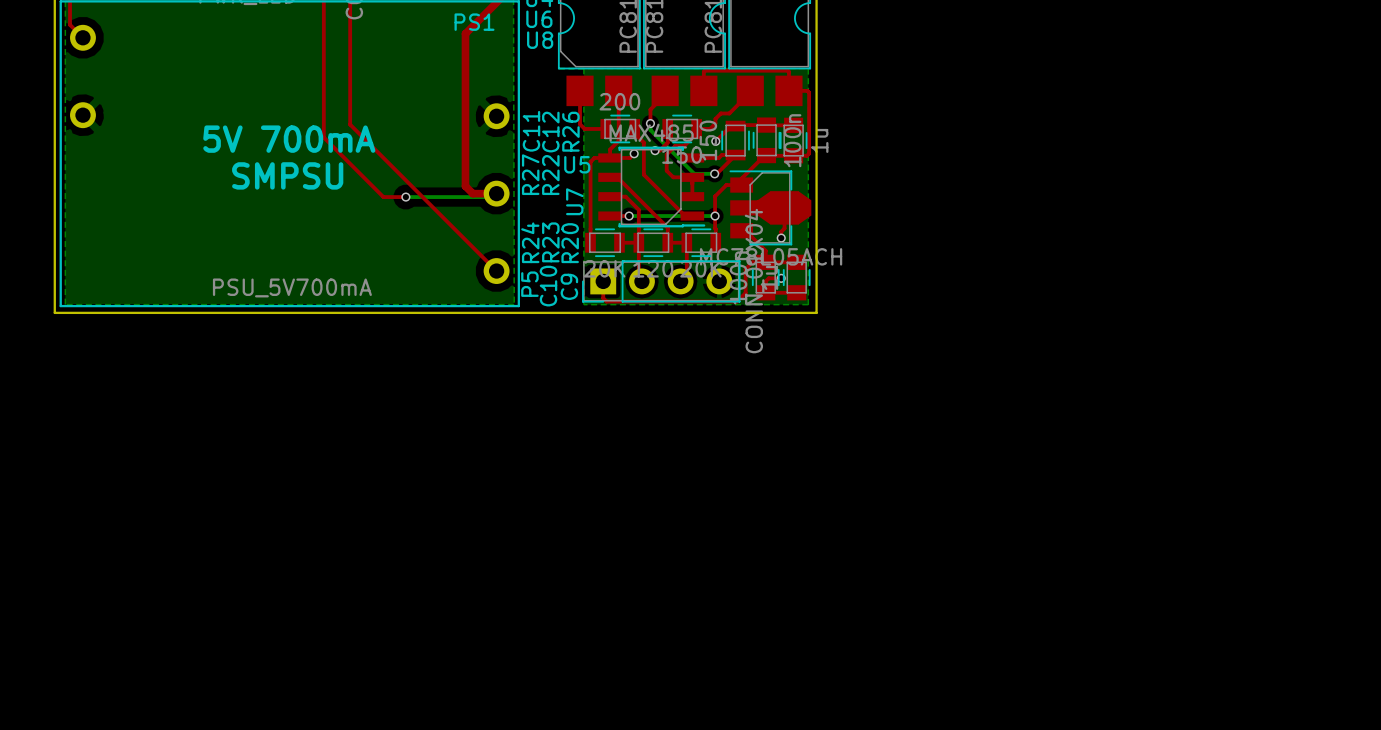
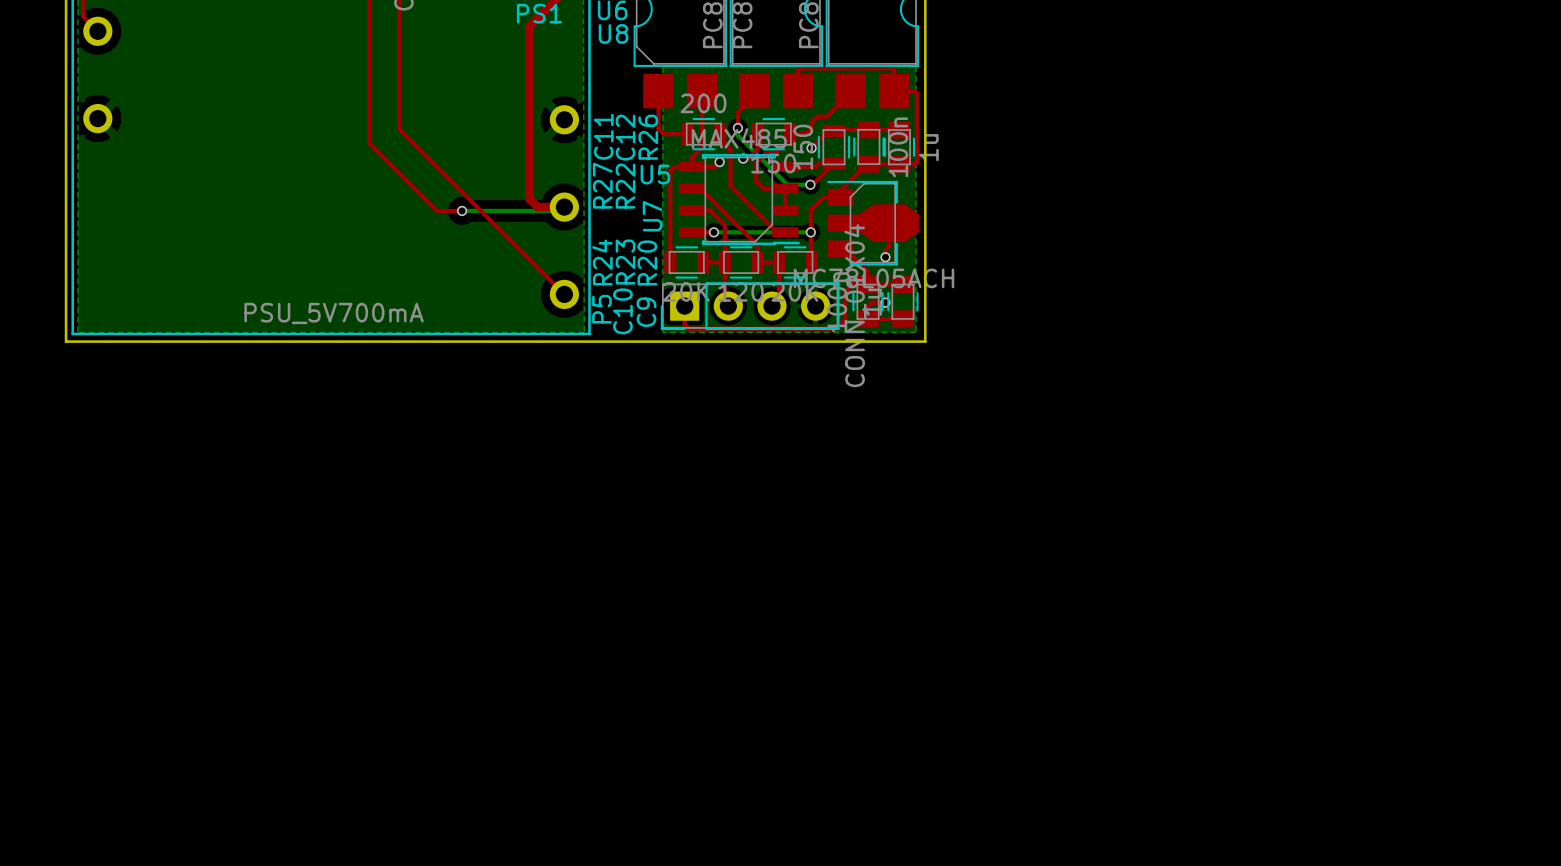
text: 5V 700mA (289, 139) -> none
text: SMPSU (287, 175) -> none

